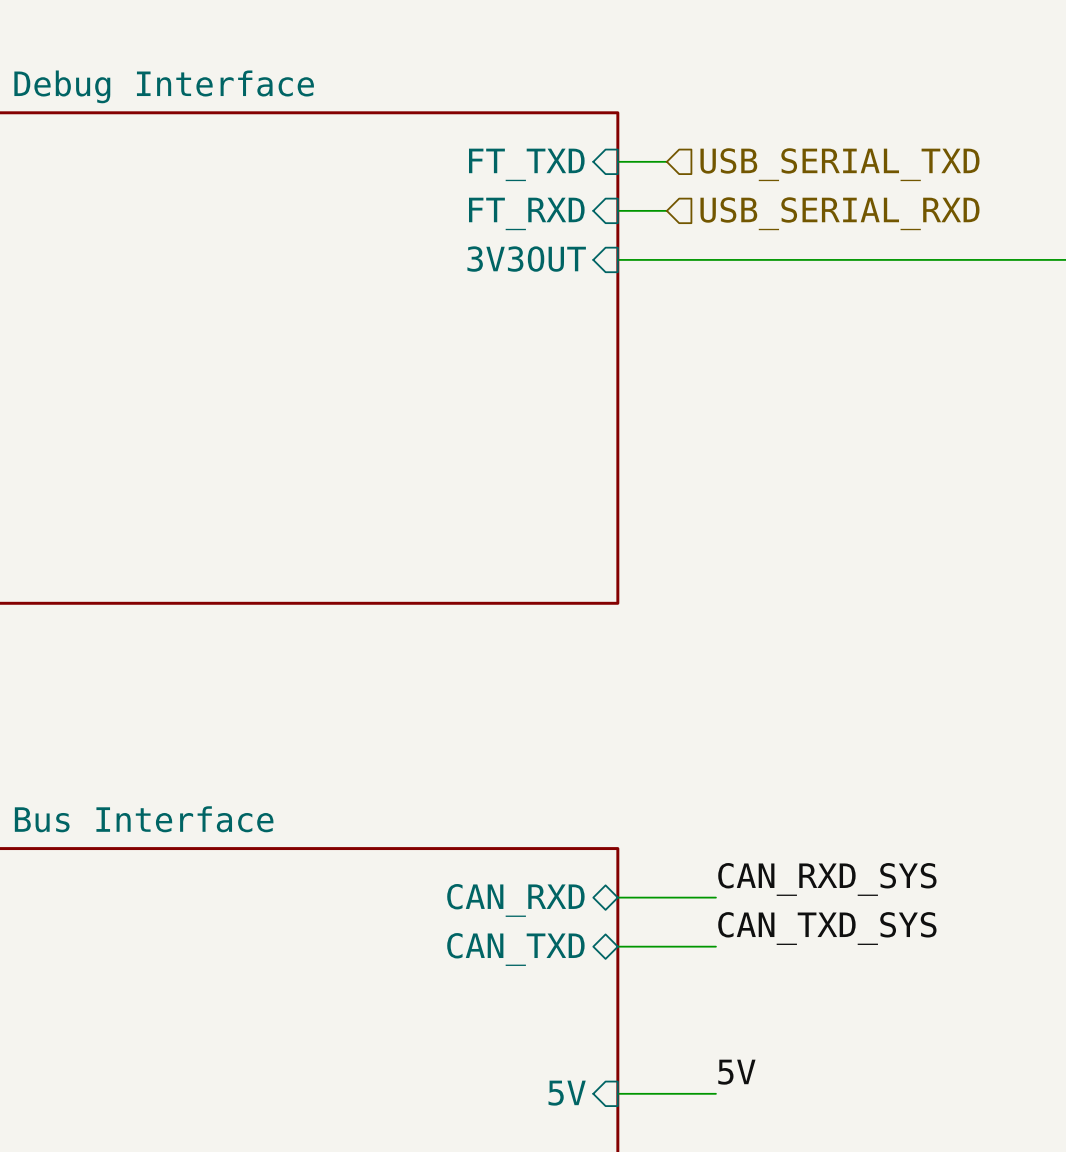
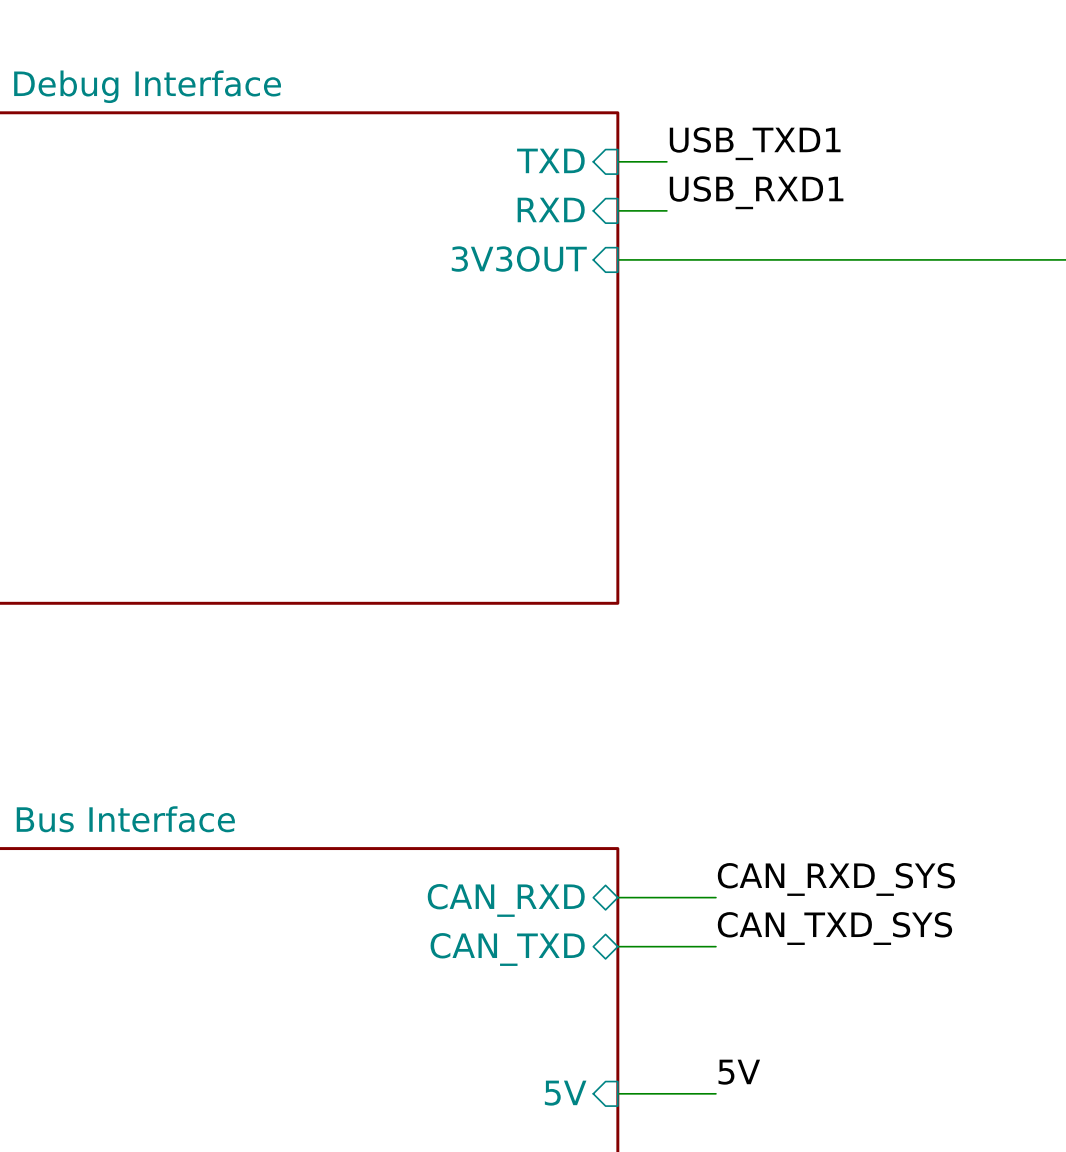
label: none -> USB_TXD1 (755, 143)
sheet pin: FT_TXD (526, 164) -> TXD (550, 160)
hierarchical label: USB_SERIAL_TXD (839, 164) -> none
label: none -> USB_RXD1 (756, 192)
sheet pin: FT_RXD (526, 213) -> RXD (551, 209)
hierarchical label: USB_SERIAL_RXD (839, 213) -> none

